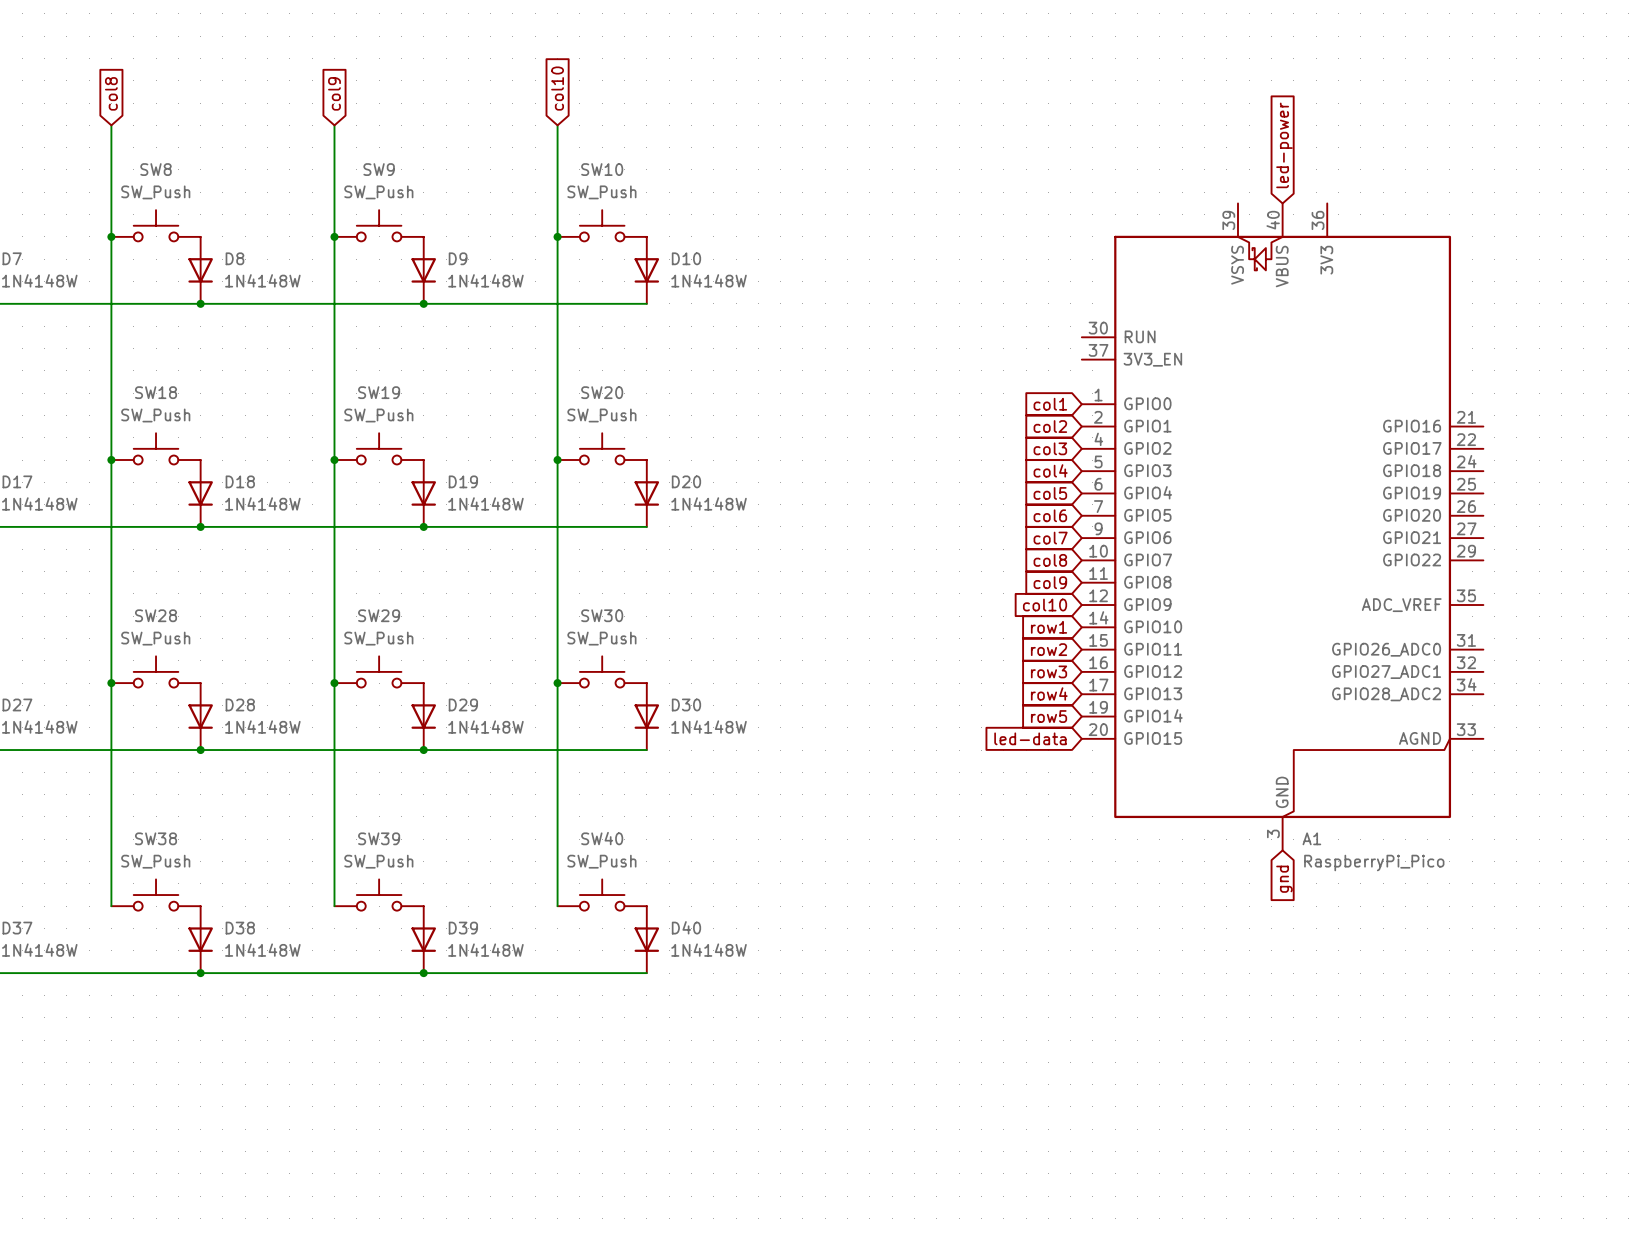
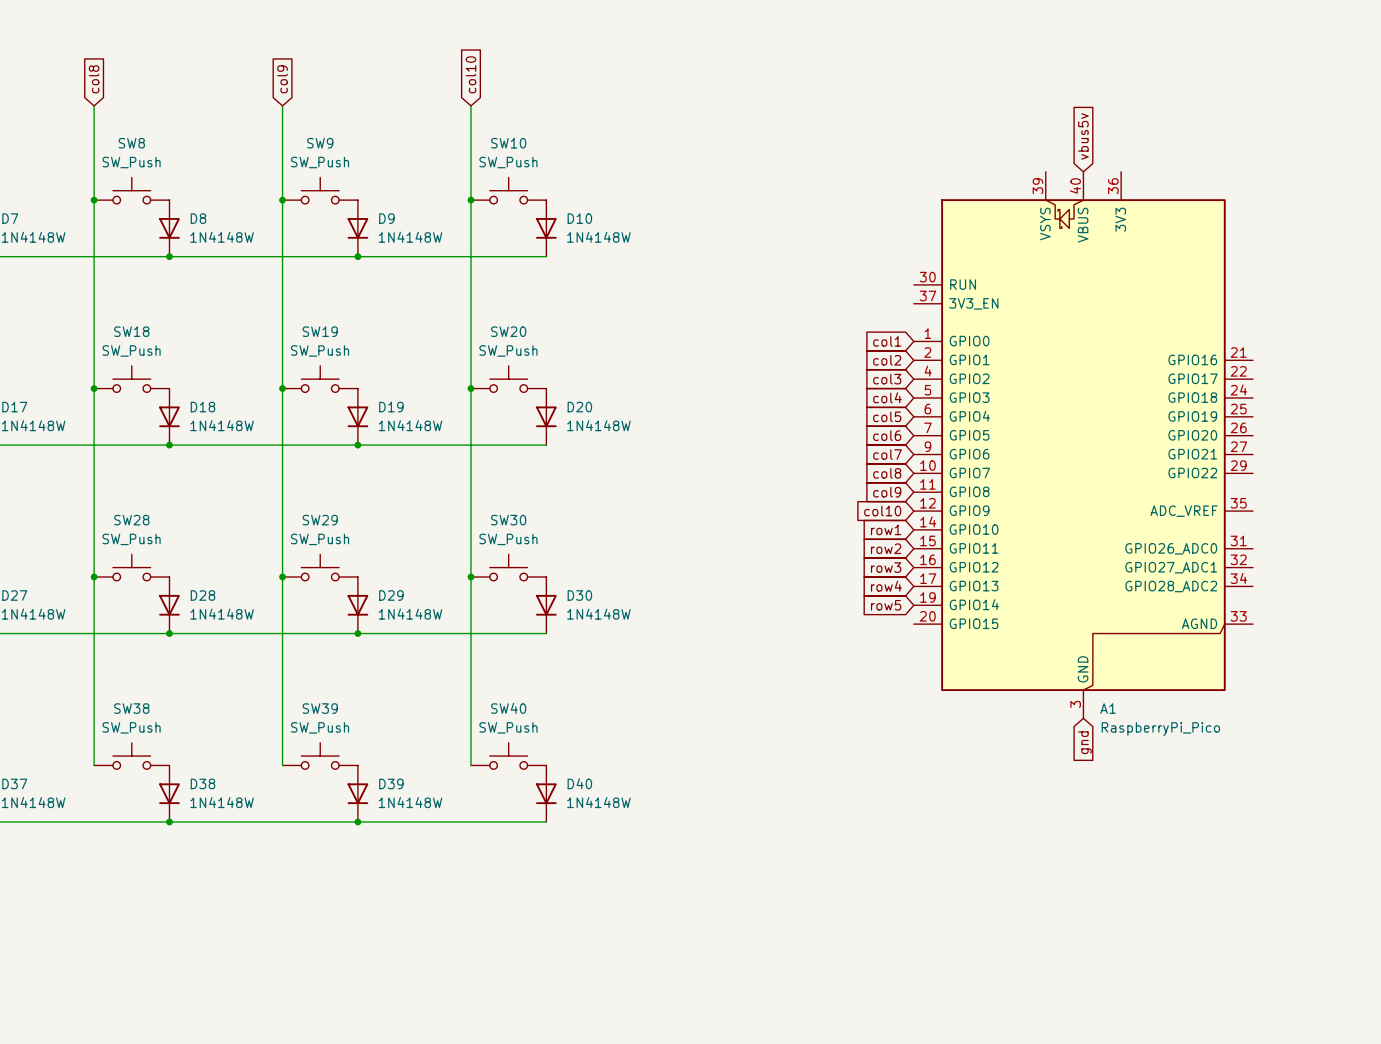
global label: led-power (1284, 145) -> vbus5v (1083, 136)
global label: led-data (1030, 738) -> none

